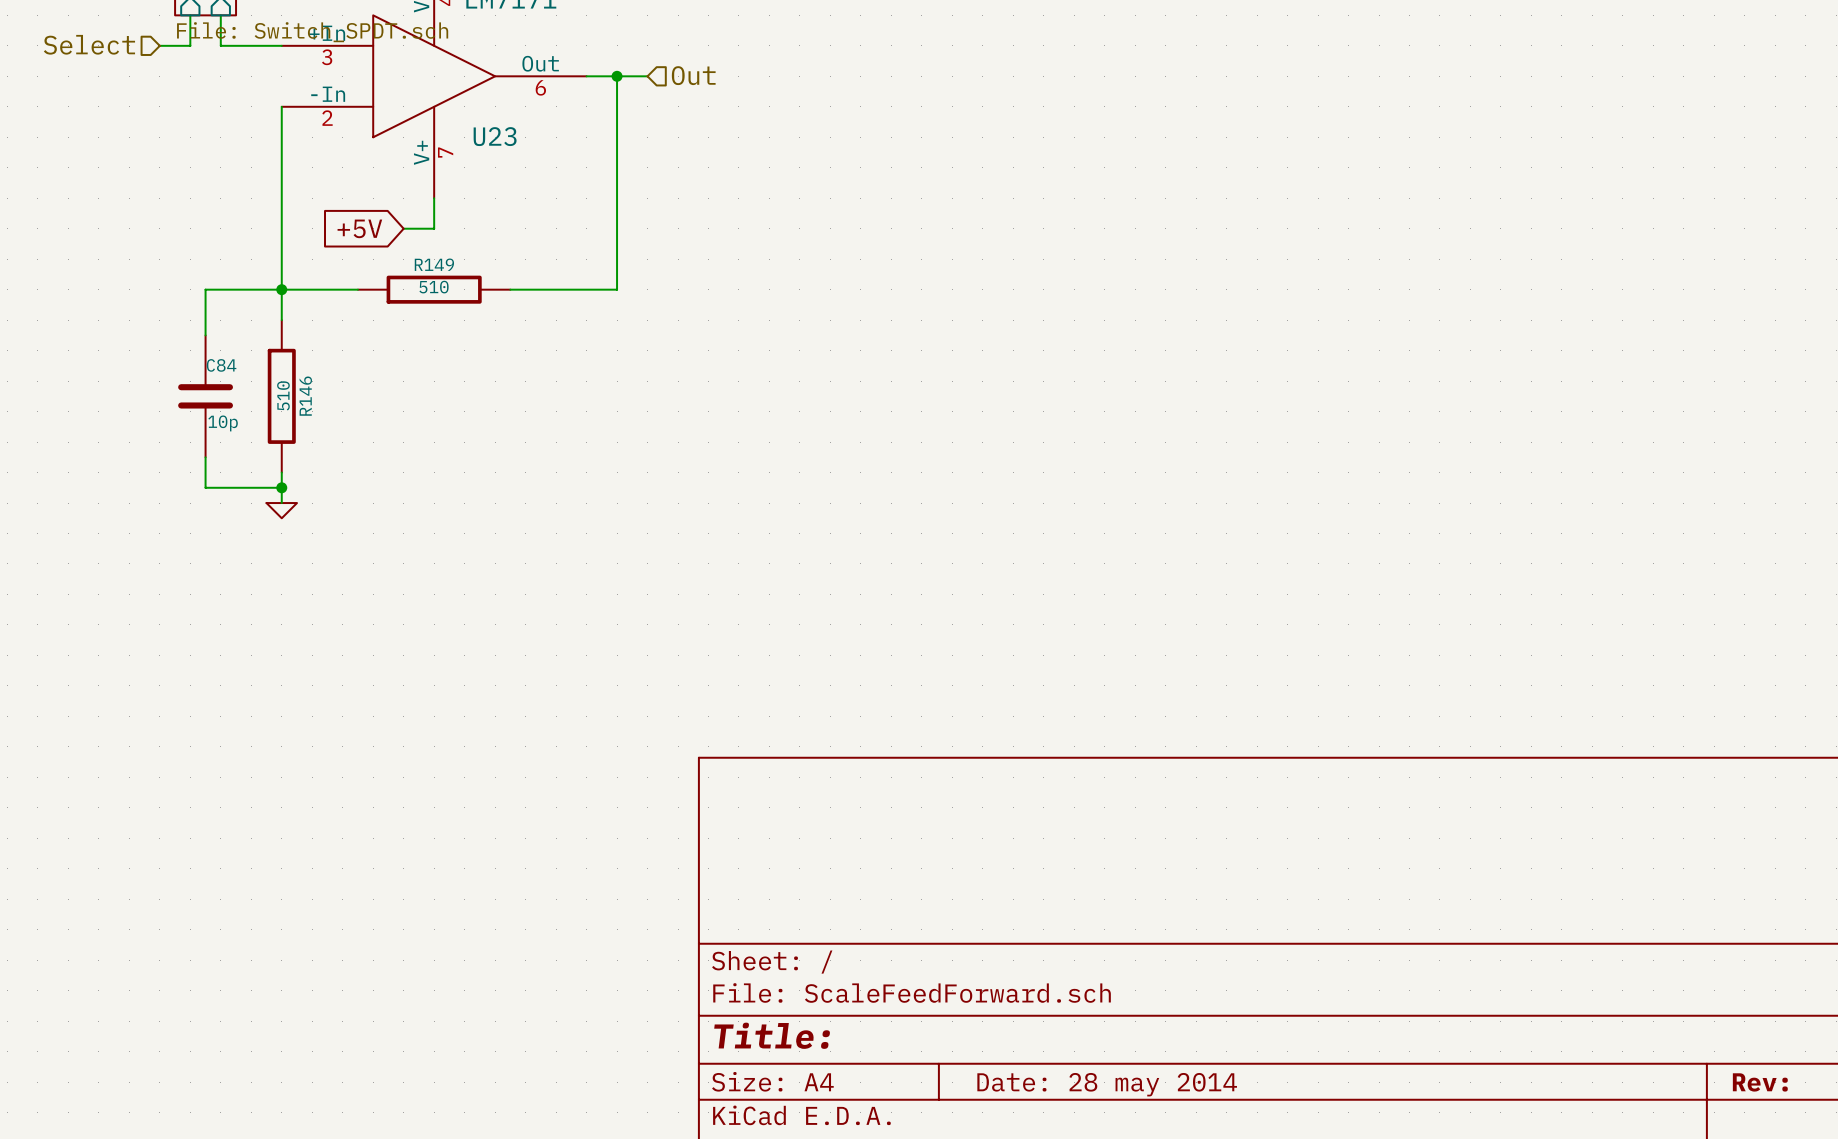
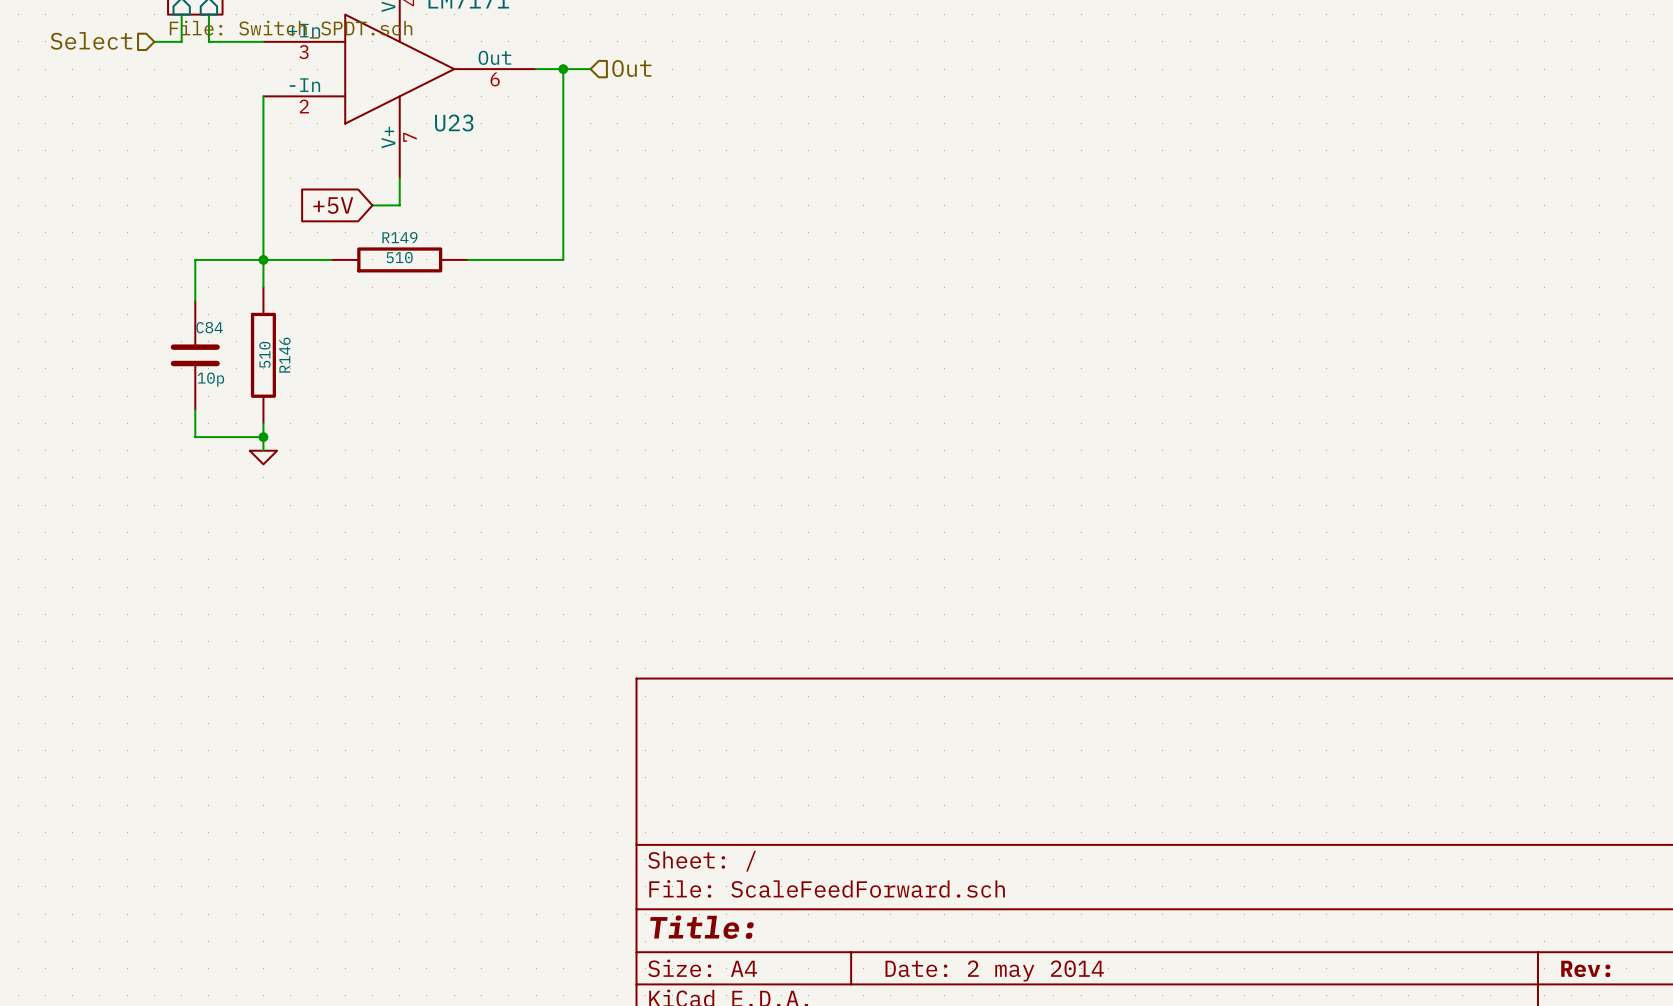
title block: Date: 28 may 2014 (1107, 1084) -> Date: 2 may 2014 (994, 970)

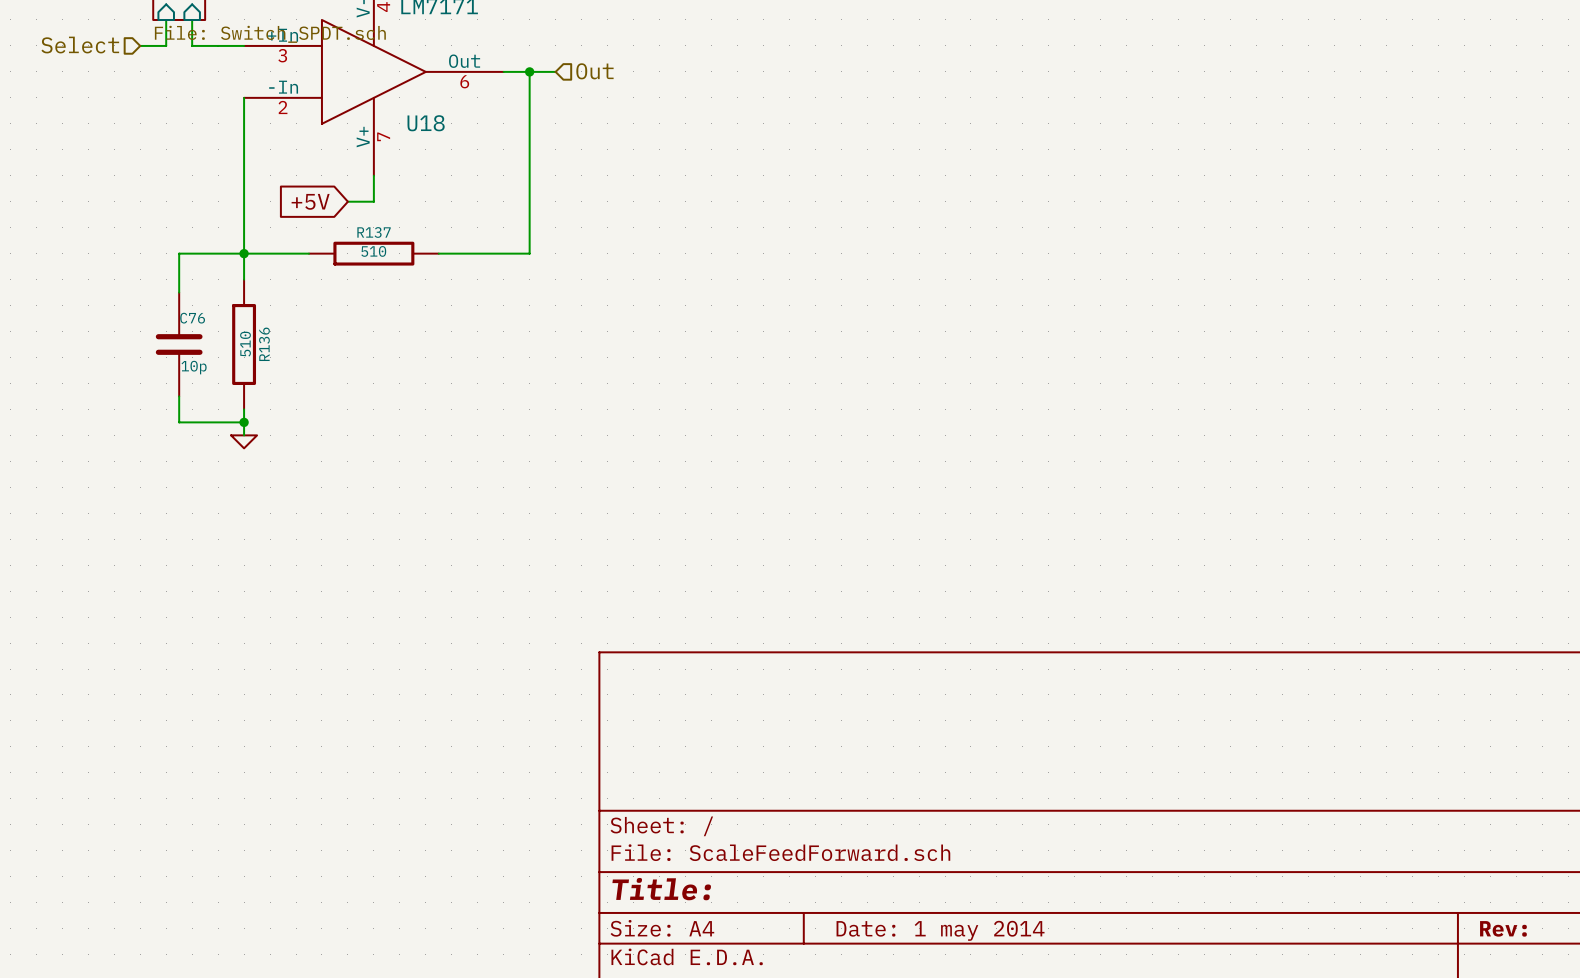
U23 name: U23 (454, 123) -> U18 (426, 123)
R149 name: R149 (399, 237) -> R137 (374, 232)
C84 name: C84 (209, 327) -> C76 (192, 318)
R146 name: R146 (284, 355) -> R136 (264, 344)
title block: Date: 2 may 2014 (994, 970) -> Date: 1 may 2014 (940, 930)

